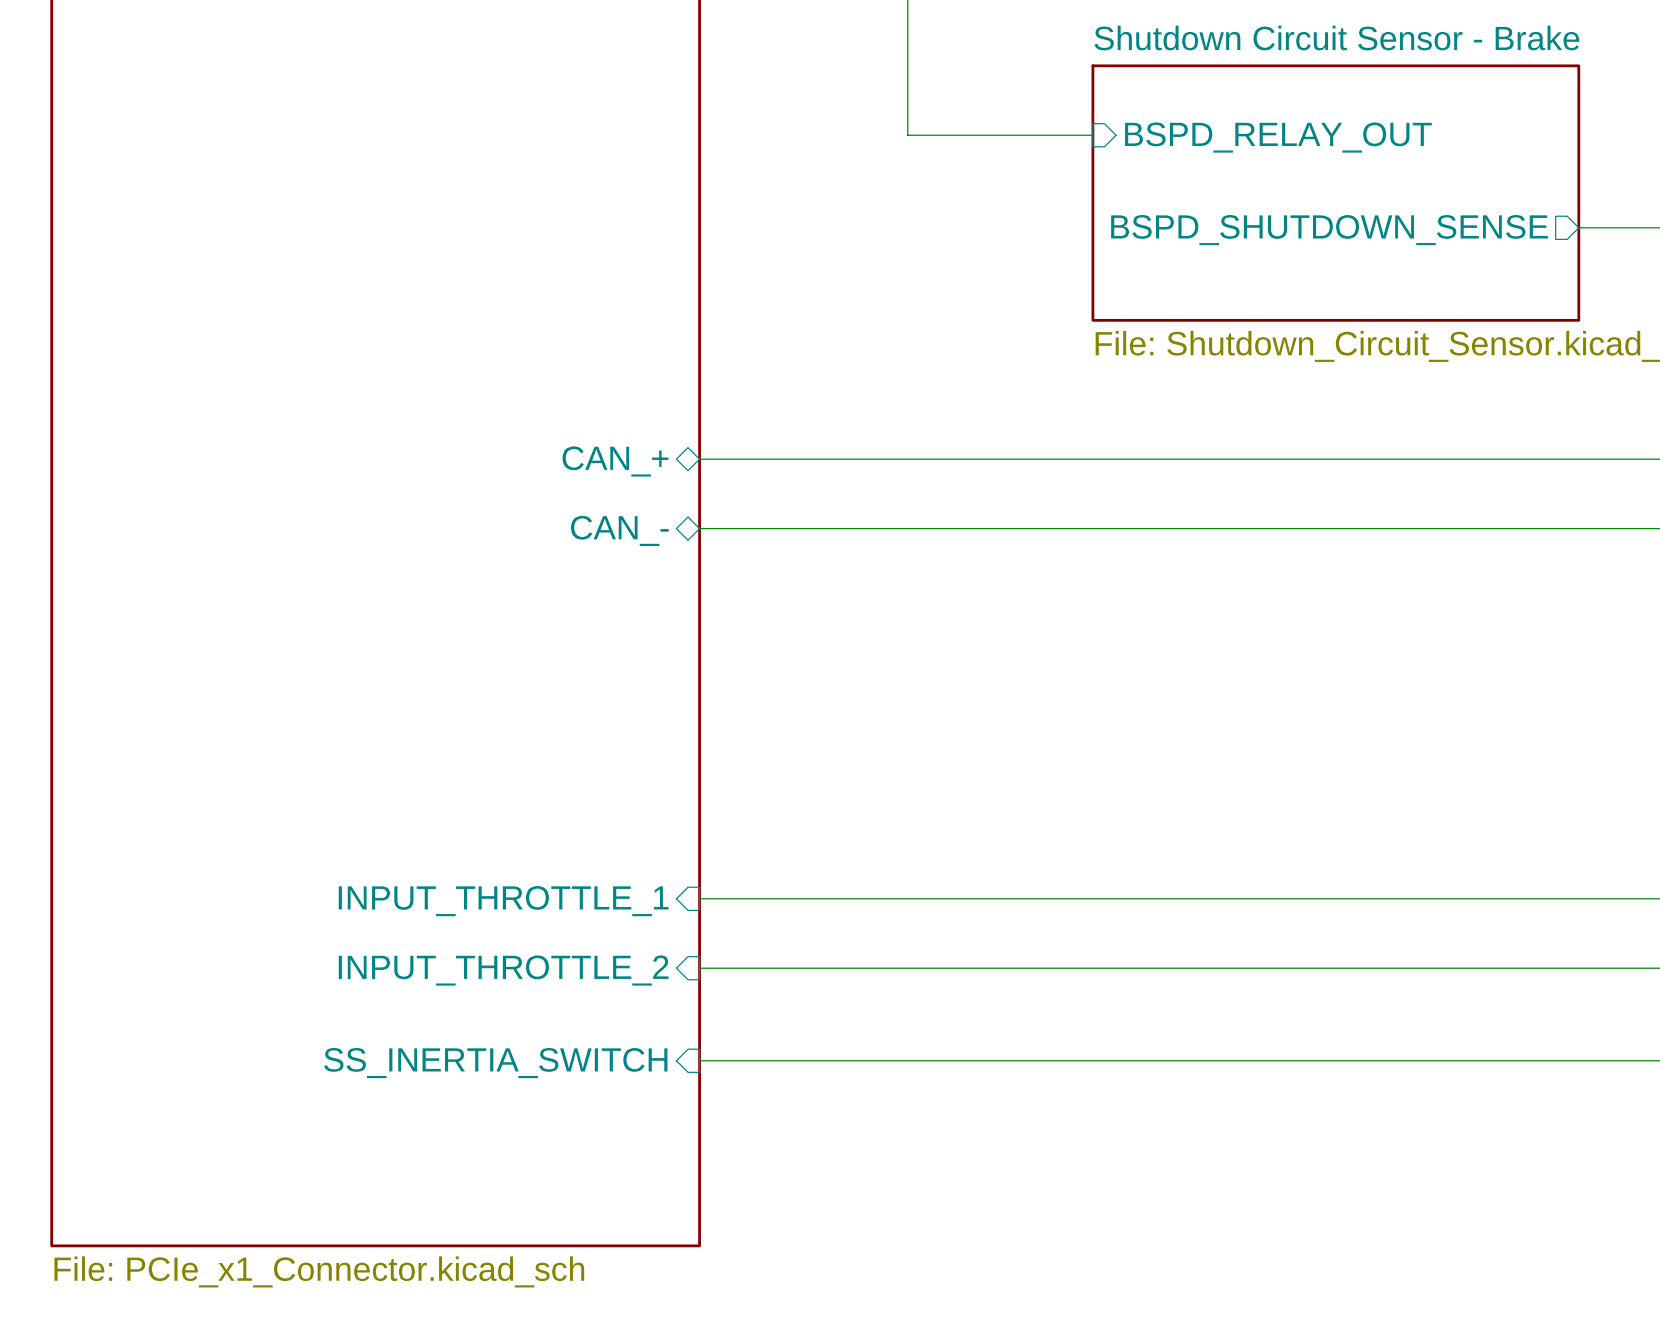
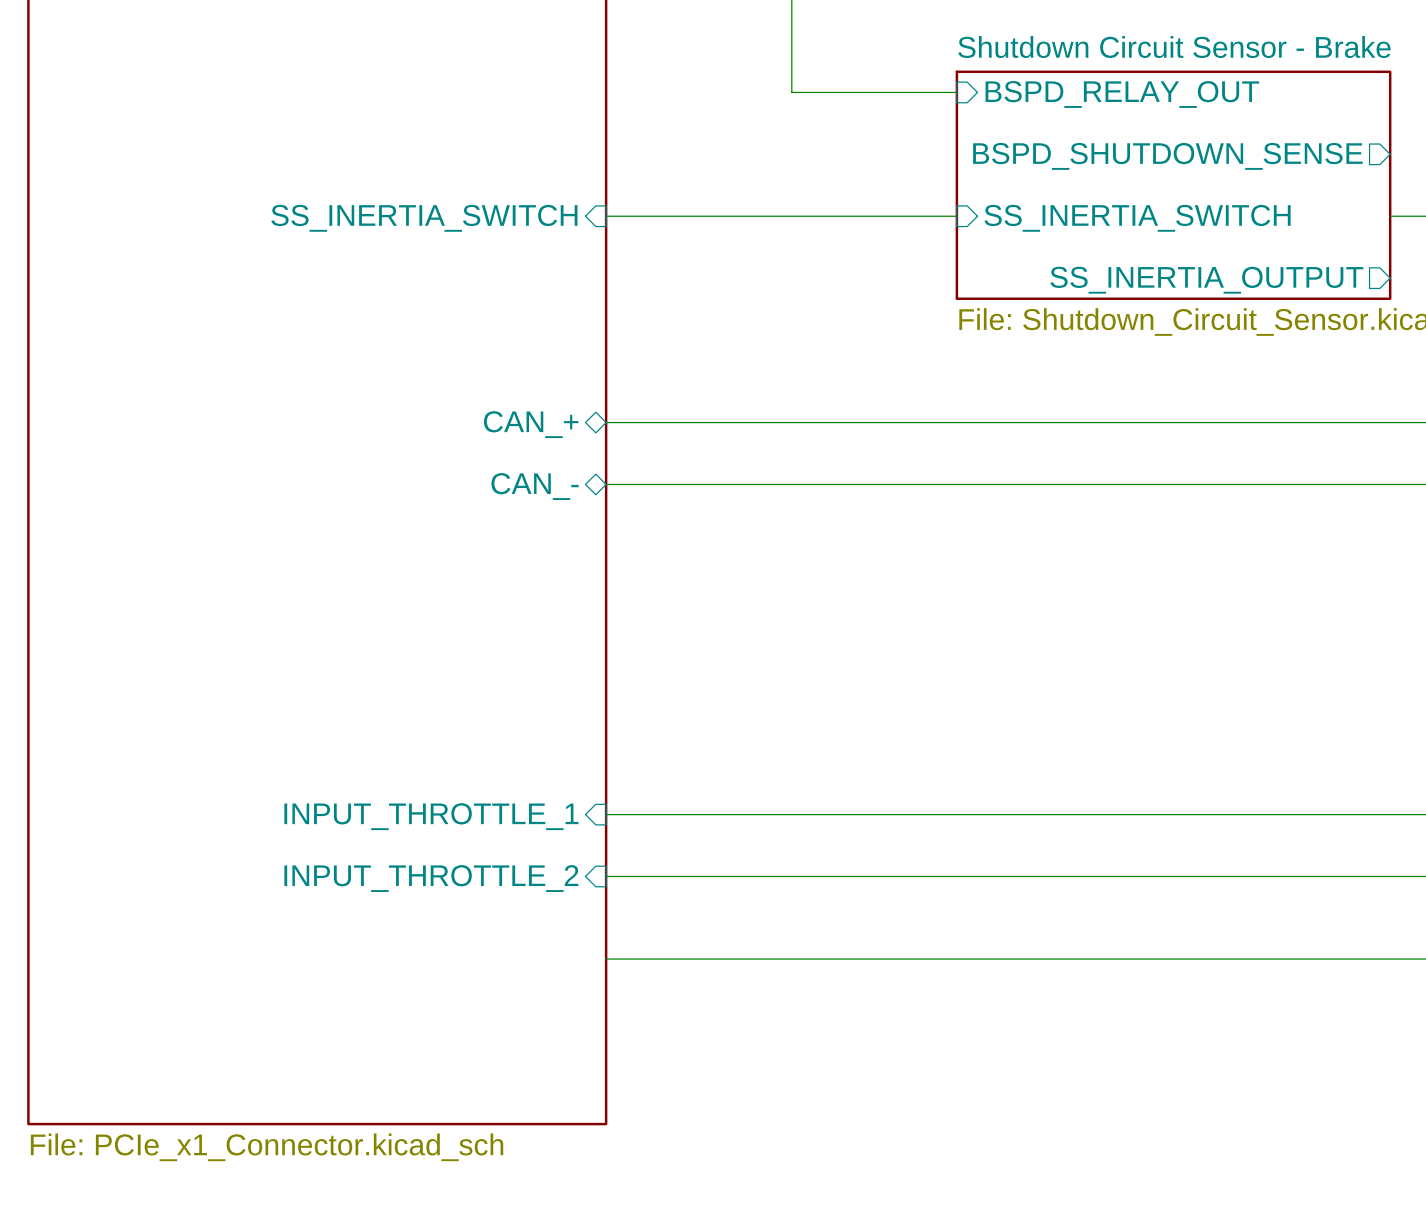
wire: (907, 88) (907, 135) (1092, 135) -> (791, 92) (956, 92)
sheet pin position: BSPD_RELAY_OUT (1278, 137) -> BSPD_RELAY_OUT (1122, 94)
wire: none -> (606, 216) (956, 216)
sheet pin: none -> SS_INERTIA_SWITCH (424, 218)
sheet pin: none -> SS_INERTIA_SWITCH (1137, 218)
sheet pin position: BSPD_SHUTDOWN_SENSE (1329, 230) -> BSPD_SHUTDOWN_SENSE (1167, 156)
sheet pin: none -> SS_INERTIA_OUTPUT (1206, 280)
sheet pin: SS_INERTIA_SWITCH (495, 1063) -> none

